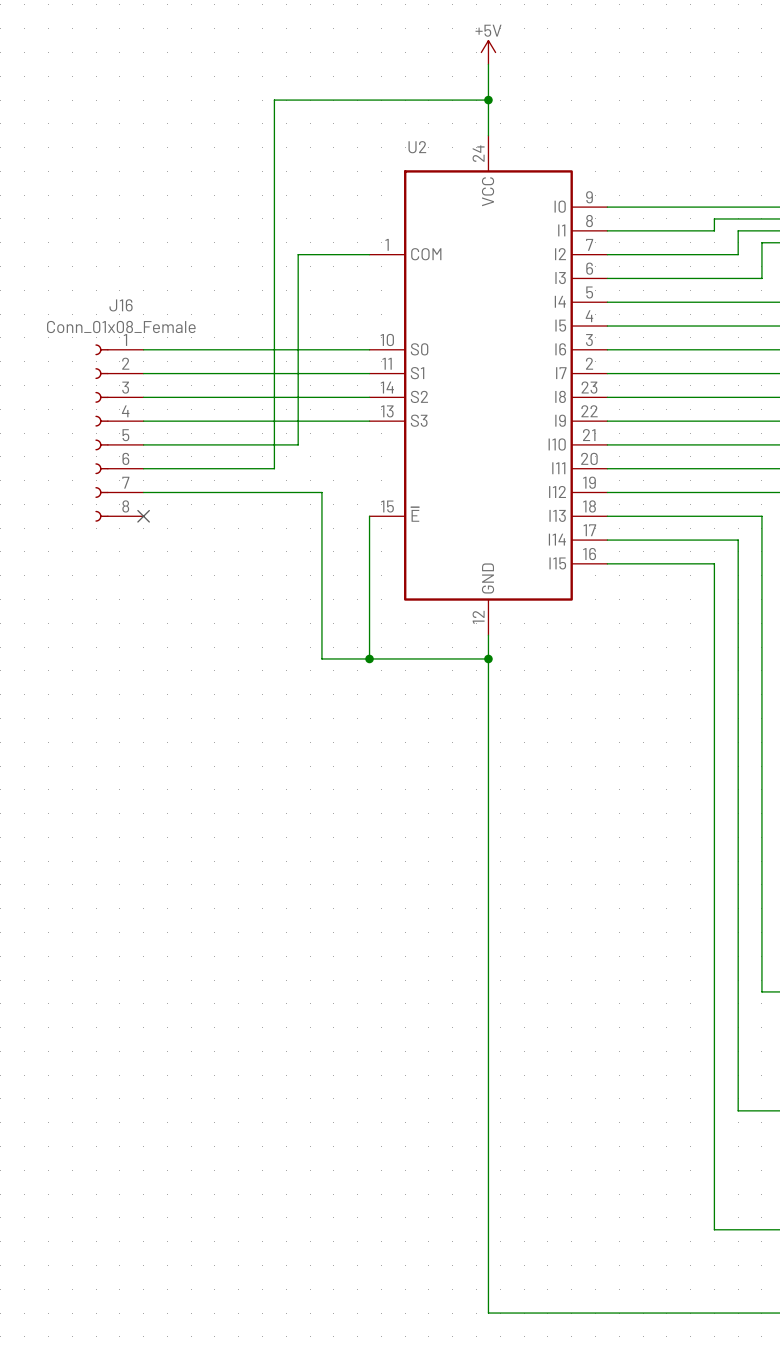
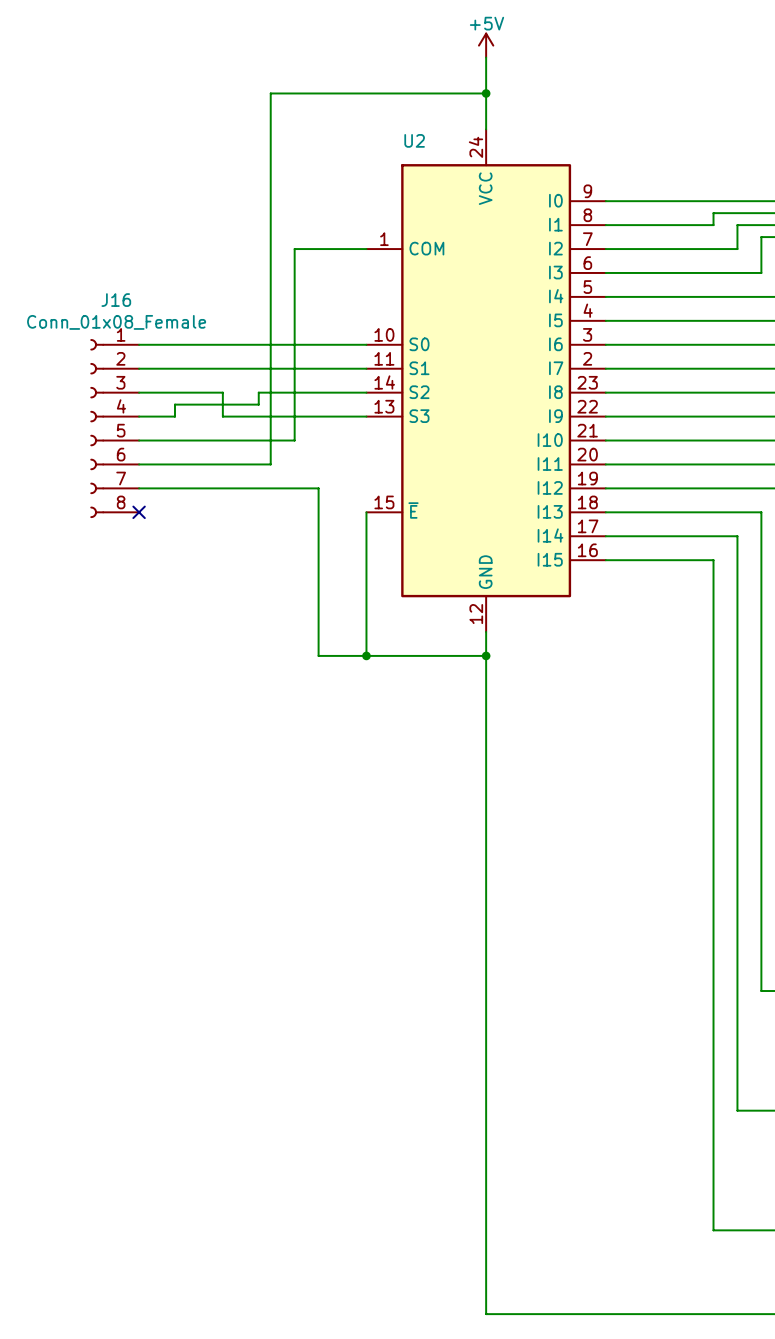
wire: (226, 397) (262, 397) -> (222, 392) (222, 416)
wire: (179, 421) (226, 421) -> (174, 416) (174, 404) (258, 404) (258, 392)

